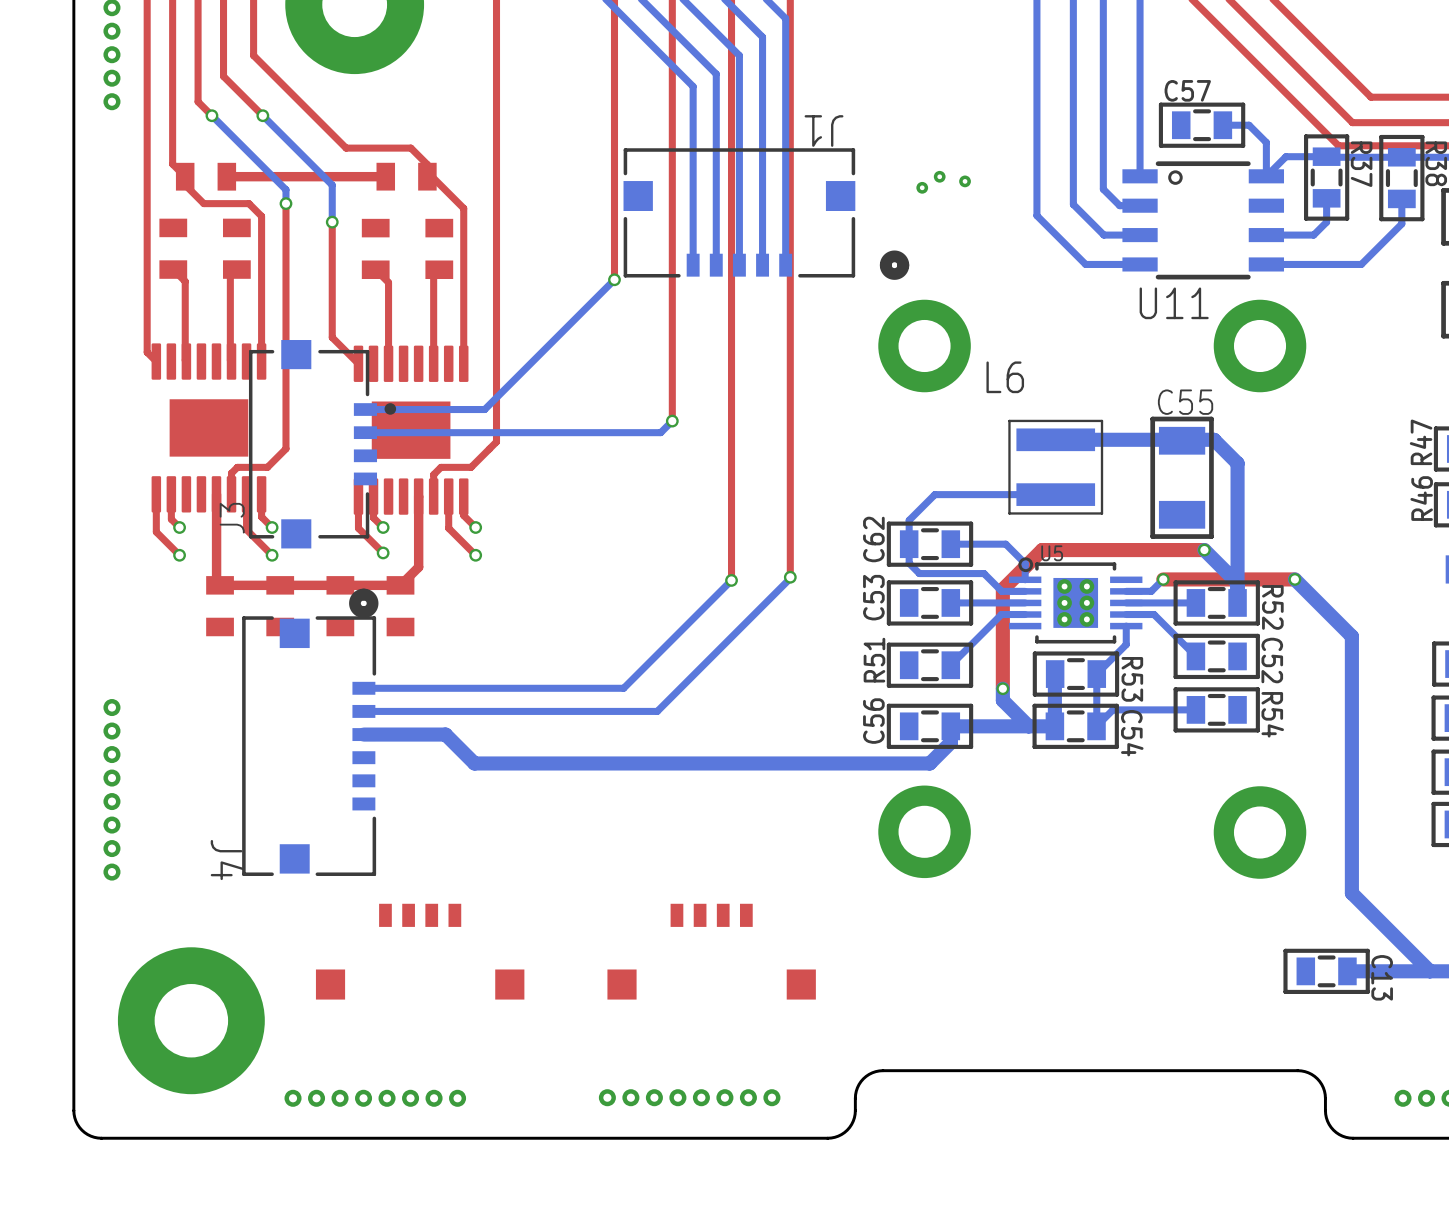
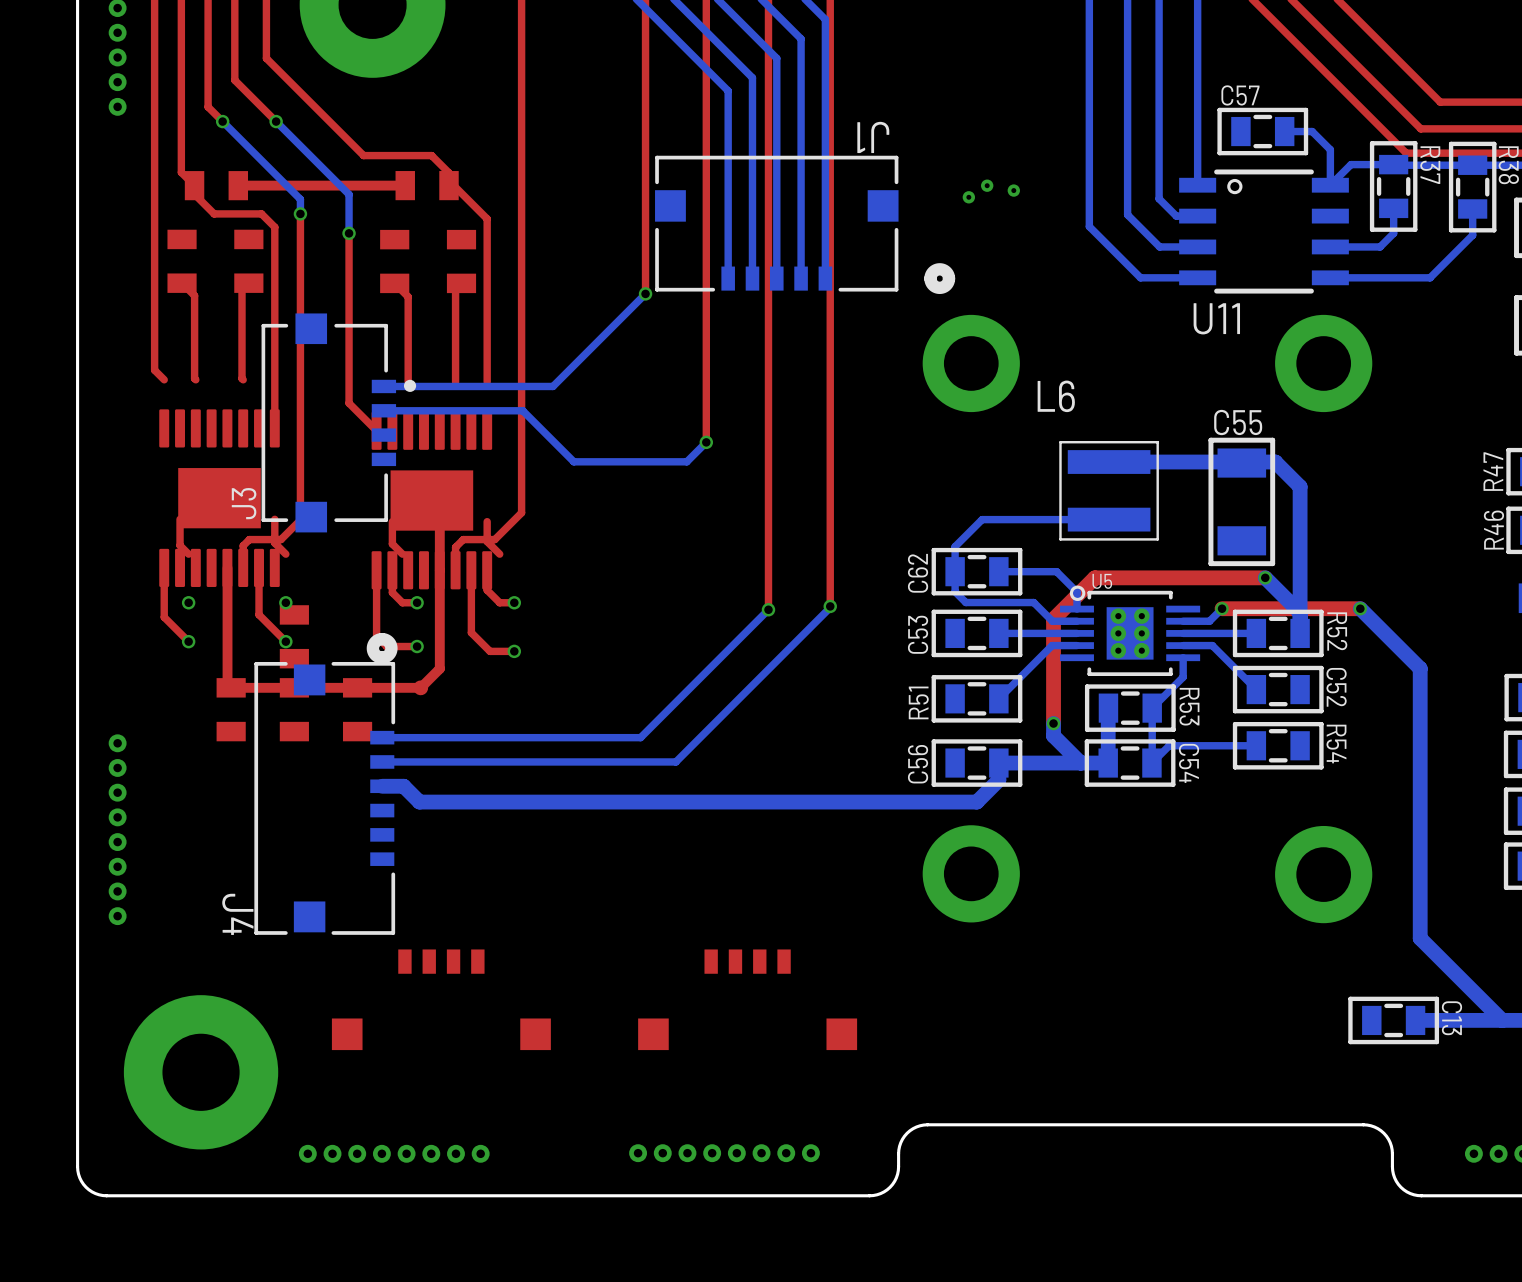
top track: (332, 337) (358, 363) -> (349, 354) (349, 403) (376, 430)
bottom track: (526, 367) (484, 409) (365, 409) -> (552, 386) (383, 386)
part position: (208, 427) -> (219, 498)
part position: (411, 430) -> (431, 500)
bottom track: (660, 432) (365, 432) -> (694, 454) (686, 461) (573, 461) (522, 410) (383, 410)
top track: (496, 441) (471, 467) (440, 467) (433, 474) (433, 496) -> (521, 464) (521, 512) (494, 539) (463, 539) (455, 547) (455, 570)
J3 position: (322, 444) -> (338, 422)
top track: (285, 448) (267, 467) (237, 467) (231, 473) (231, 494) -> (300, 471) (300, 520) (280, 539) (249, 539) (243, 545) (243, 567)
top track: (156, 494) (156, 532) (179, 555) -> none
top track: (216, 494) (216, 540) -> (274, 379) (274, 428)
top track: (246, 494) (246, 529) (272, 555) -> none
top track: (358, 496) (358, 528) (383, 552) -> none
top track: (448, 496) (448, 528) (475, 555) -> none
via: (179, 527) -> none
via: (272, 527) -> none
via: (383, 527) -> none
via: (475, 527) -> none
top track: none -> (164, 567) (164, 617) (188, 641)
top track: none -> (259, 567) (259, 614) (285, 641)
top track: none -> (376, 570) (376, 636) (386, 646) (417, 646)
top track: none -> (392, 570) (392, 592) (402, 602) (417, 602)
top track: none -> (471, 570) (471, 632) (490, 651) (514, 651)
top track: none -> (487, 570) (487, 590) (499, 602) (514, 602)
via: (383, 552) -> none
via position: (179, 555) -> (188, 602)
via position: (272, 555) -> (285, 602)
via position: (475, 555) -> (514, 602)
top track: (418, 567) (400, 585) (220, 585) (216, 581) -> (439, 595) (439, 668) (420, 687) (231, 687) (227, 684) (227, 611)
via: none -> (417, 602)
part: (220, 606) -> none
part: (340, 606) -> none
part: (400, 606) -> none
via: none -> (188, 641)
via: none -> (285, 641)
via: none -> (417, 646)
via: none -> (514, 651)
part: none -> (231, 709)
part: none -> (294, 709)
part: none -> (357, 709)
bottom track: (623, 688) (363, 688) -> (655, 723) (640, 737) (382, 737)
bottom track: (657, 711) (363, 711) -> (690, 747) (675, 761) (382, 761)
J4 position: (310, 732) -> (325, 783)
bottom track: (363, 734) (445, 734) (474, 763) -> (382, 786) (403, 786) (419, 802) (498, 802)

